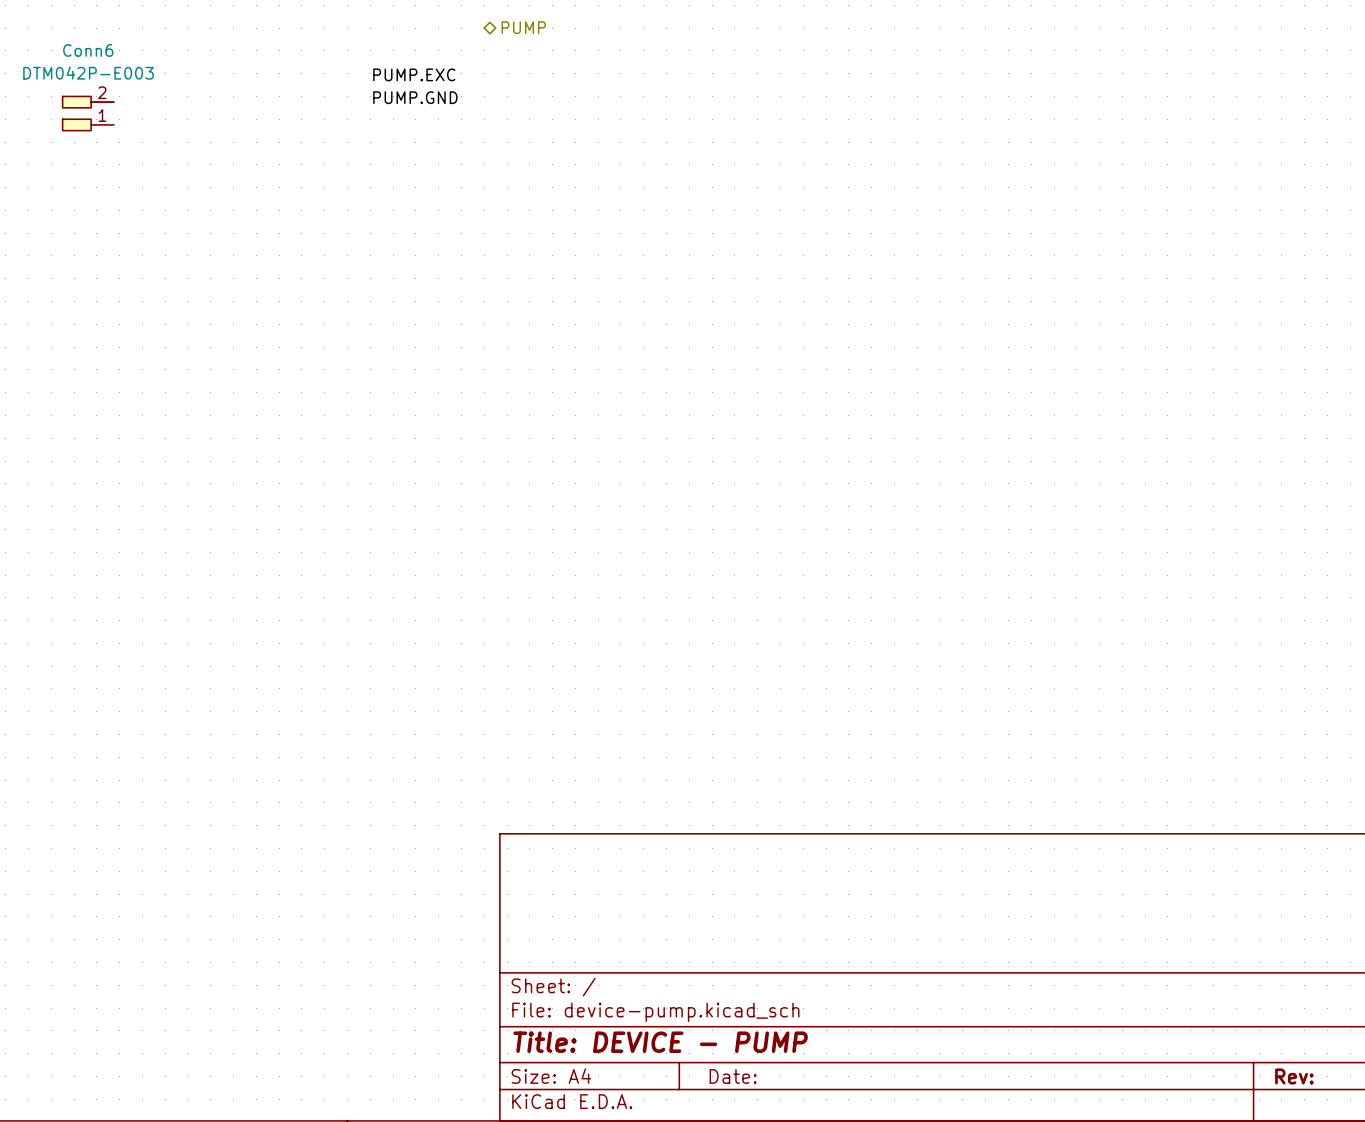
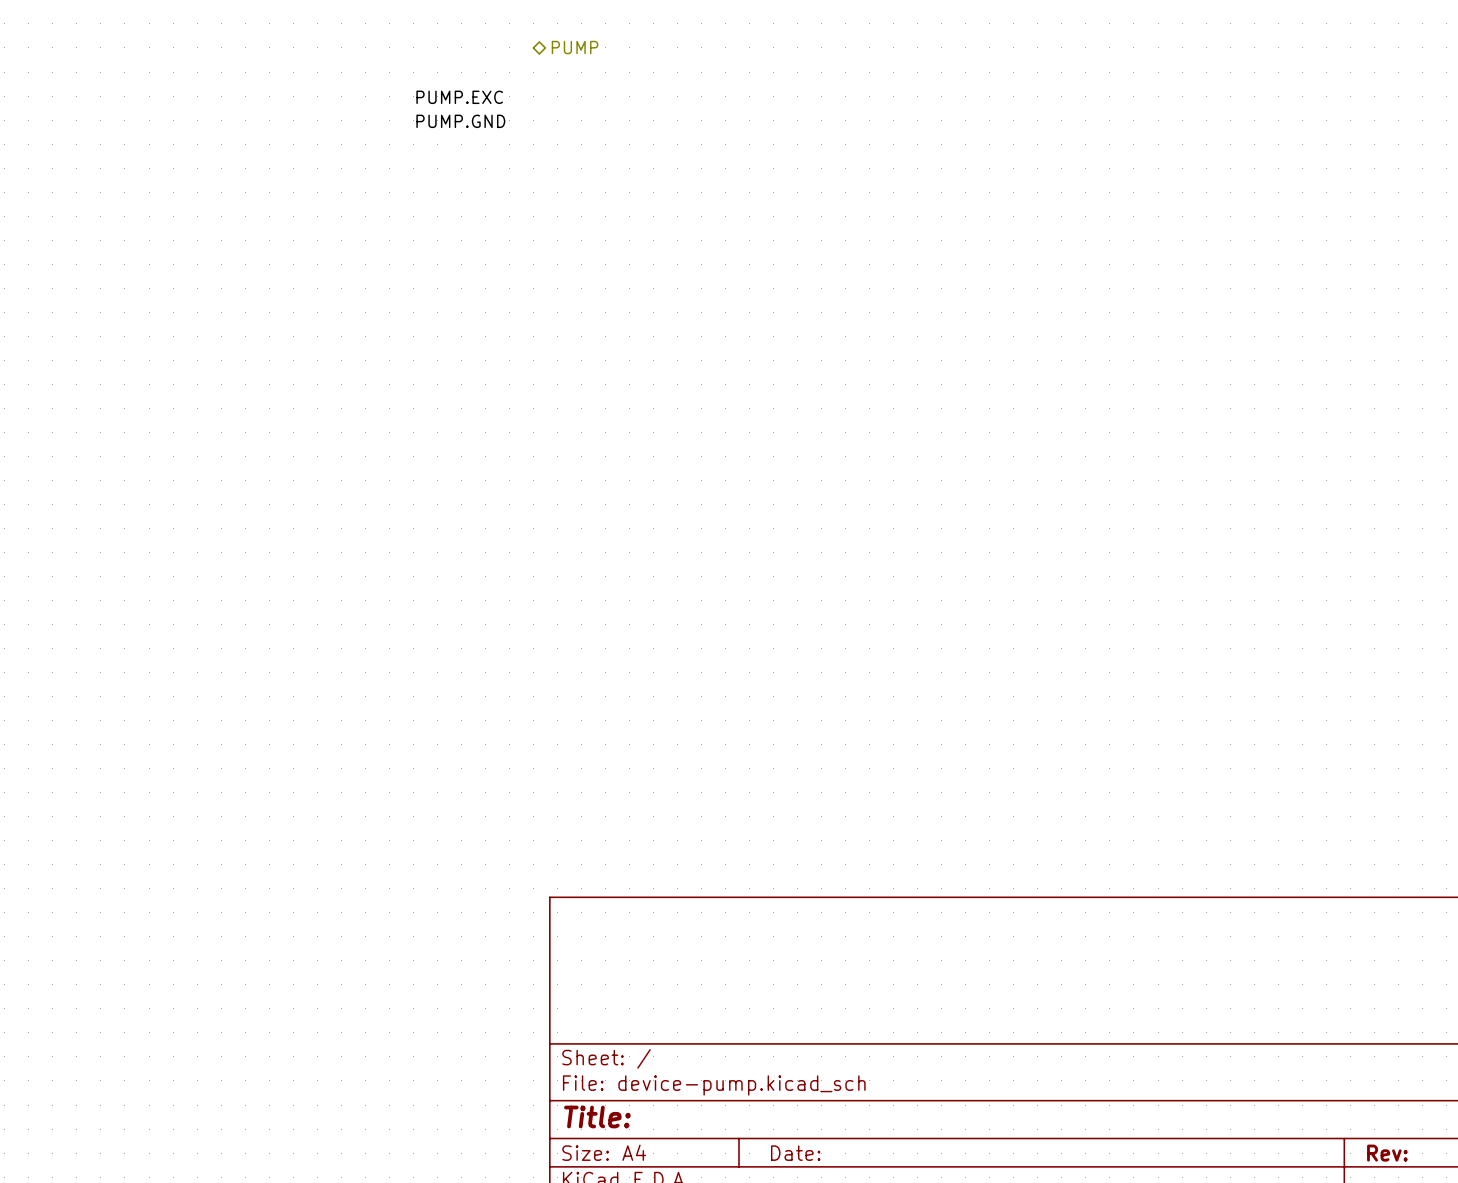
Conn6: (88, 113) -> none
title block: Title: DEVICE - PUMP (660, 1042) -> Title: (597, 1116)

